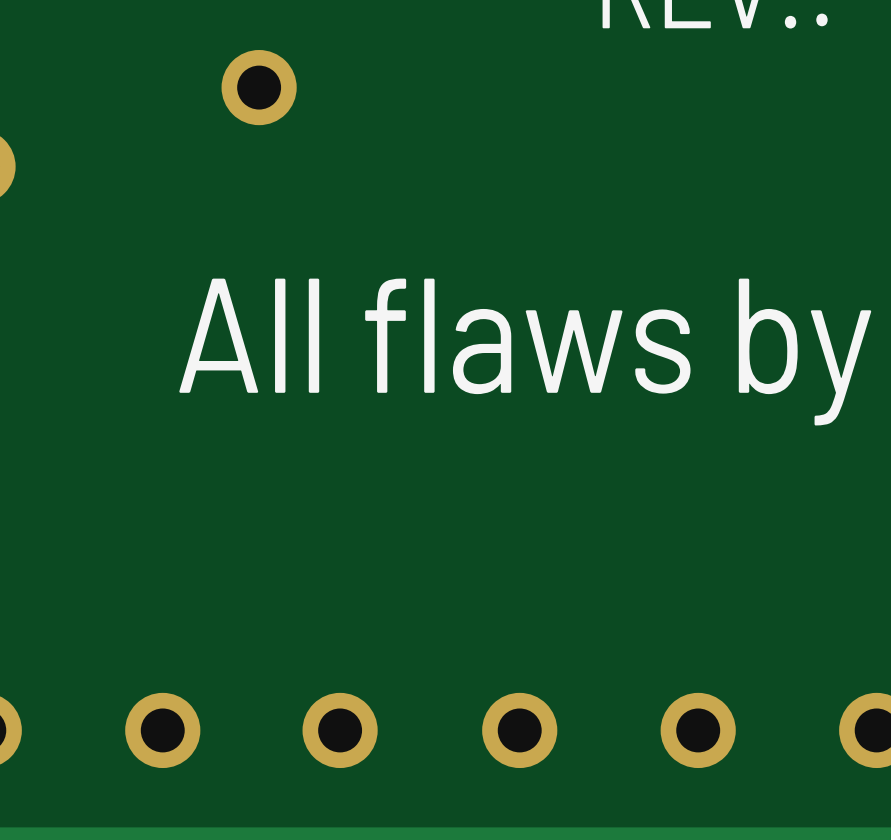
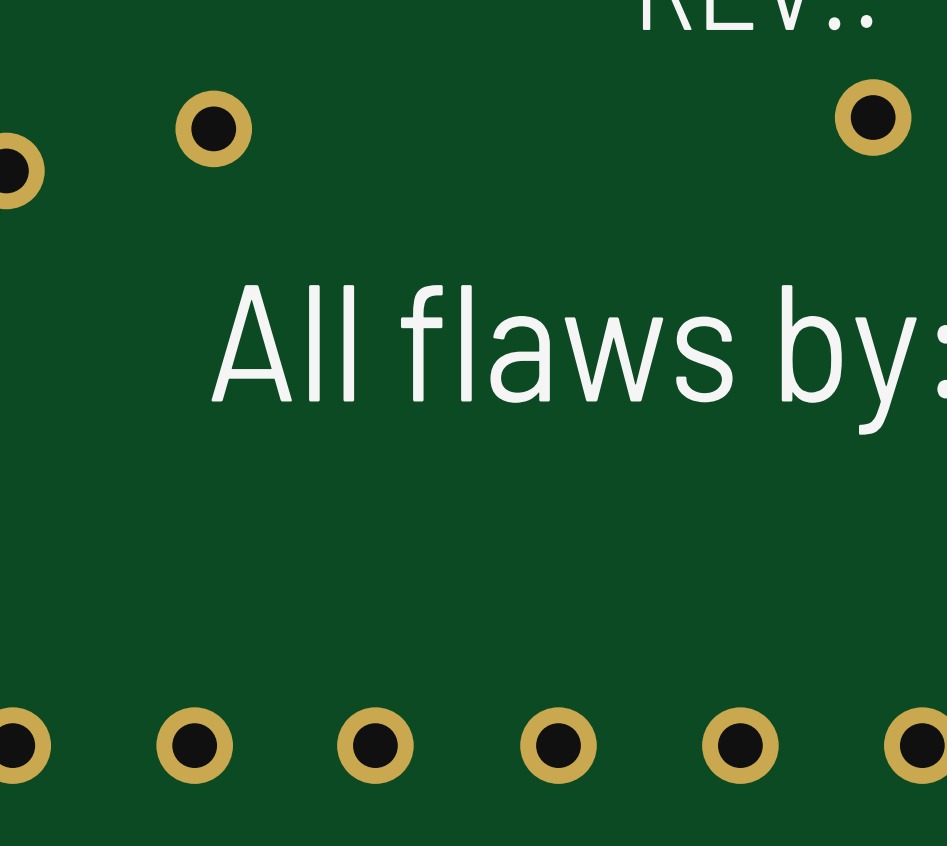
via position: (259, 87) -> (213, 128)
via: none -> (873, 117)

